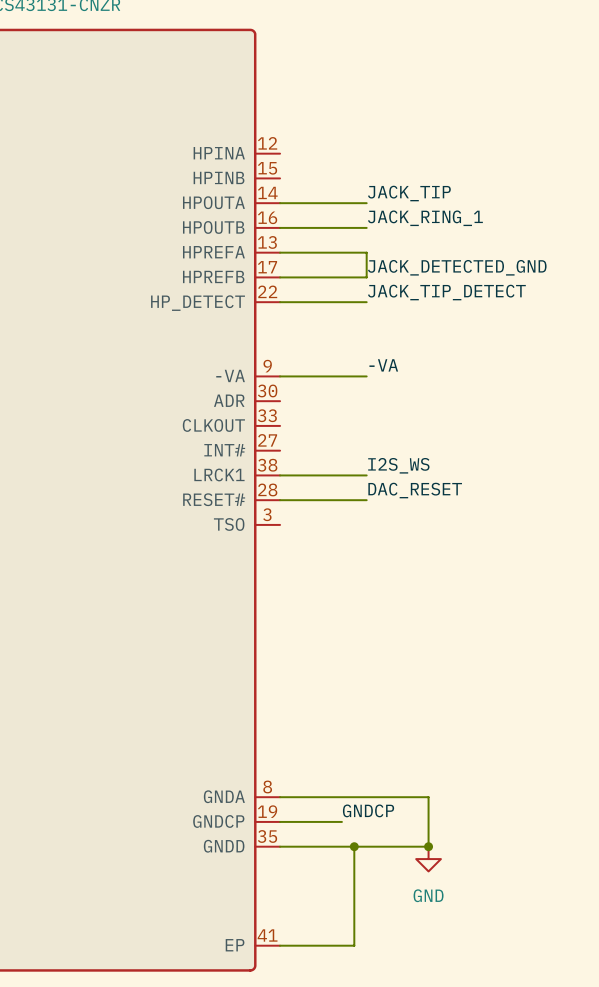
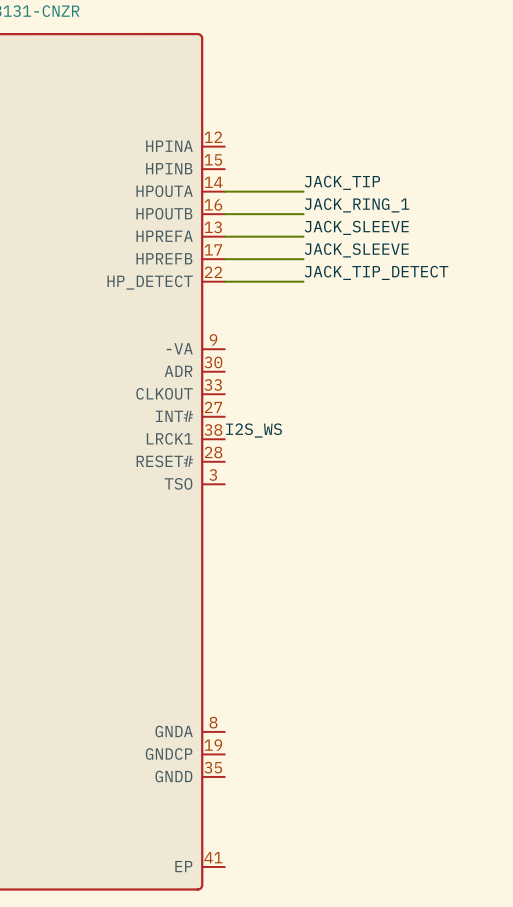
label: none -> JACK_SLEEVE (356, 227)
wire: (366, 252) (366, 277) -> none
label: JACK_DETECTED_GND (457, 267) -> JACK_SLEEVE (356, 250)
label: -VA (383, 365) -> none
wire: (280, 376) (366, 376) -> none
label position: I2S_WS (398, 465) -> I2S_WS (254, 430)
wire: (280, 475) (366, 475) -> none
label: DAC_RESET (415, 490) -> none
wire: (280, 500) (366, 500) -> none
wire: (280, 797) (428, 797) (428, 846) (280, 846) -> none
label: GNDCP (368, 810) -> none
wire: (280, 821) (341, 821) -> none
wire: (354, 846) (354, 945) (280, 945) -> none
junction: (354, 846) -> none
junction: (428, 846) -> none
power symbol: GND (428, 859) -> none

